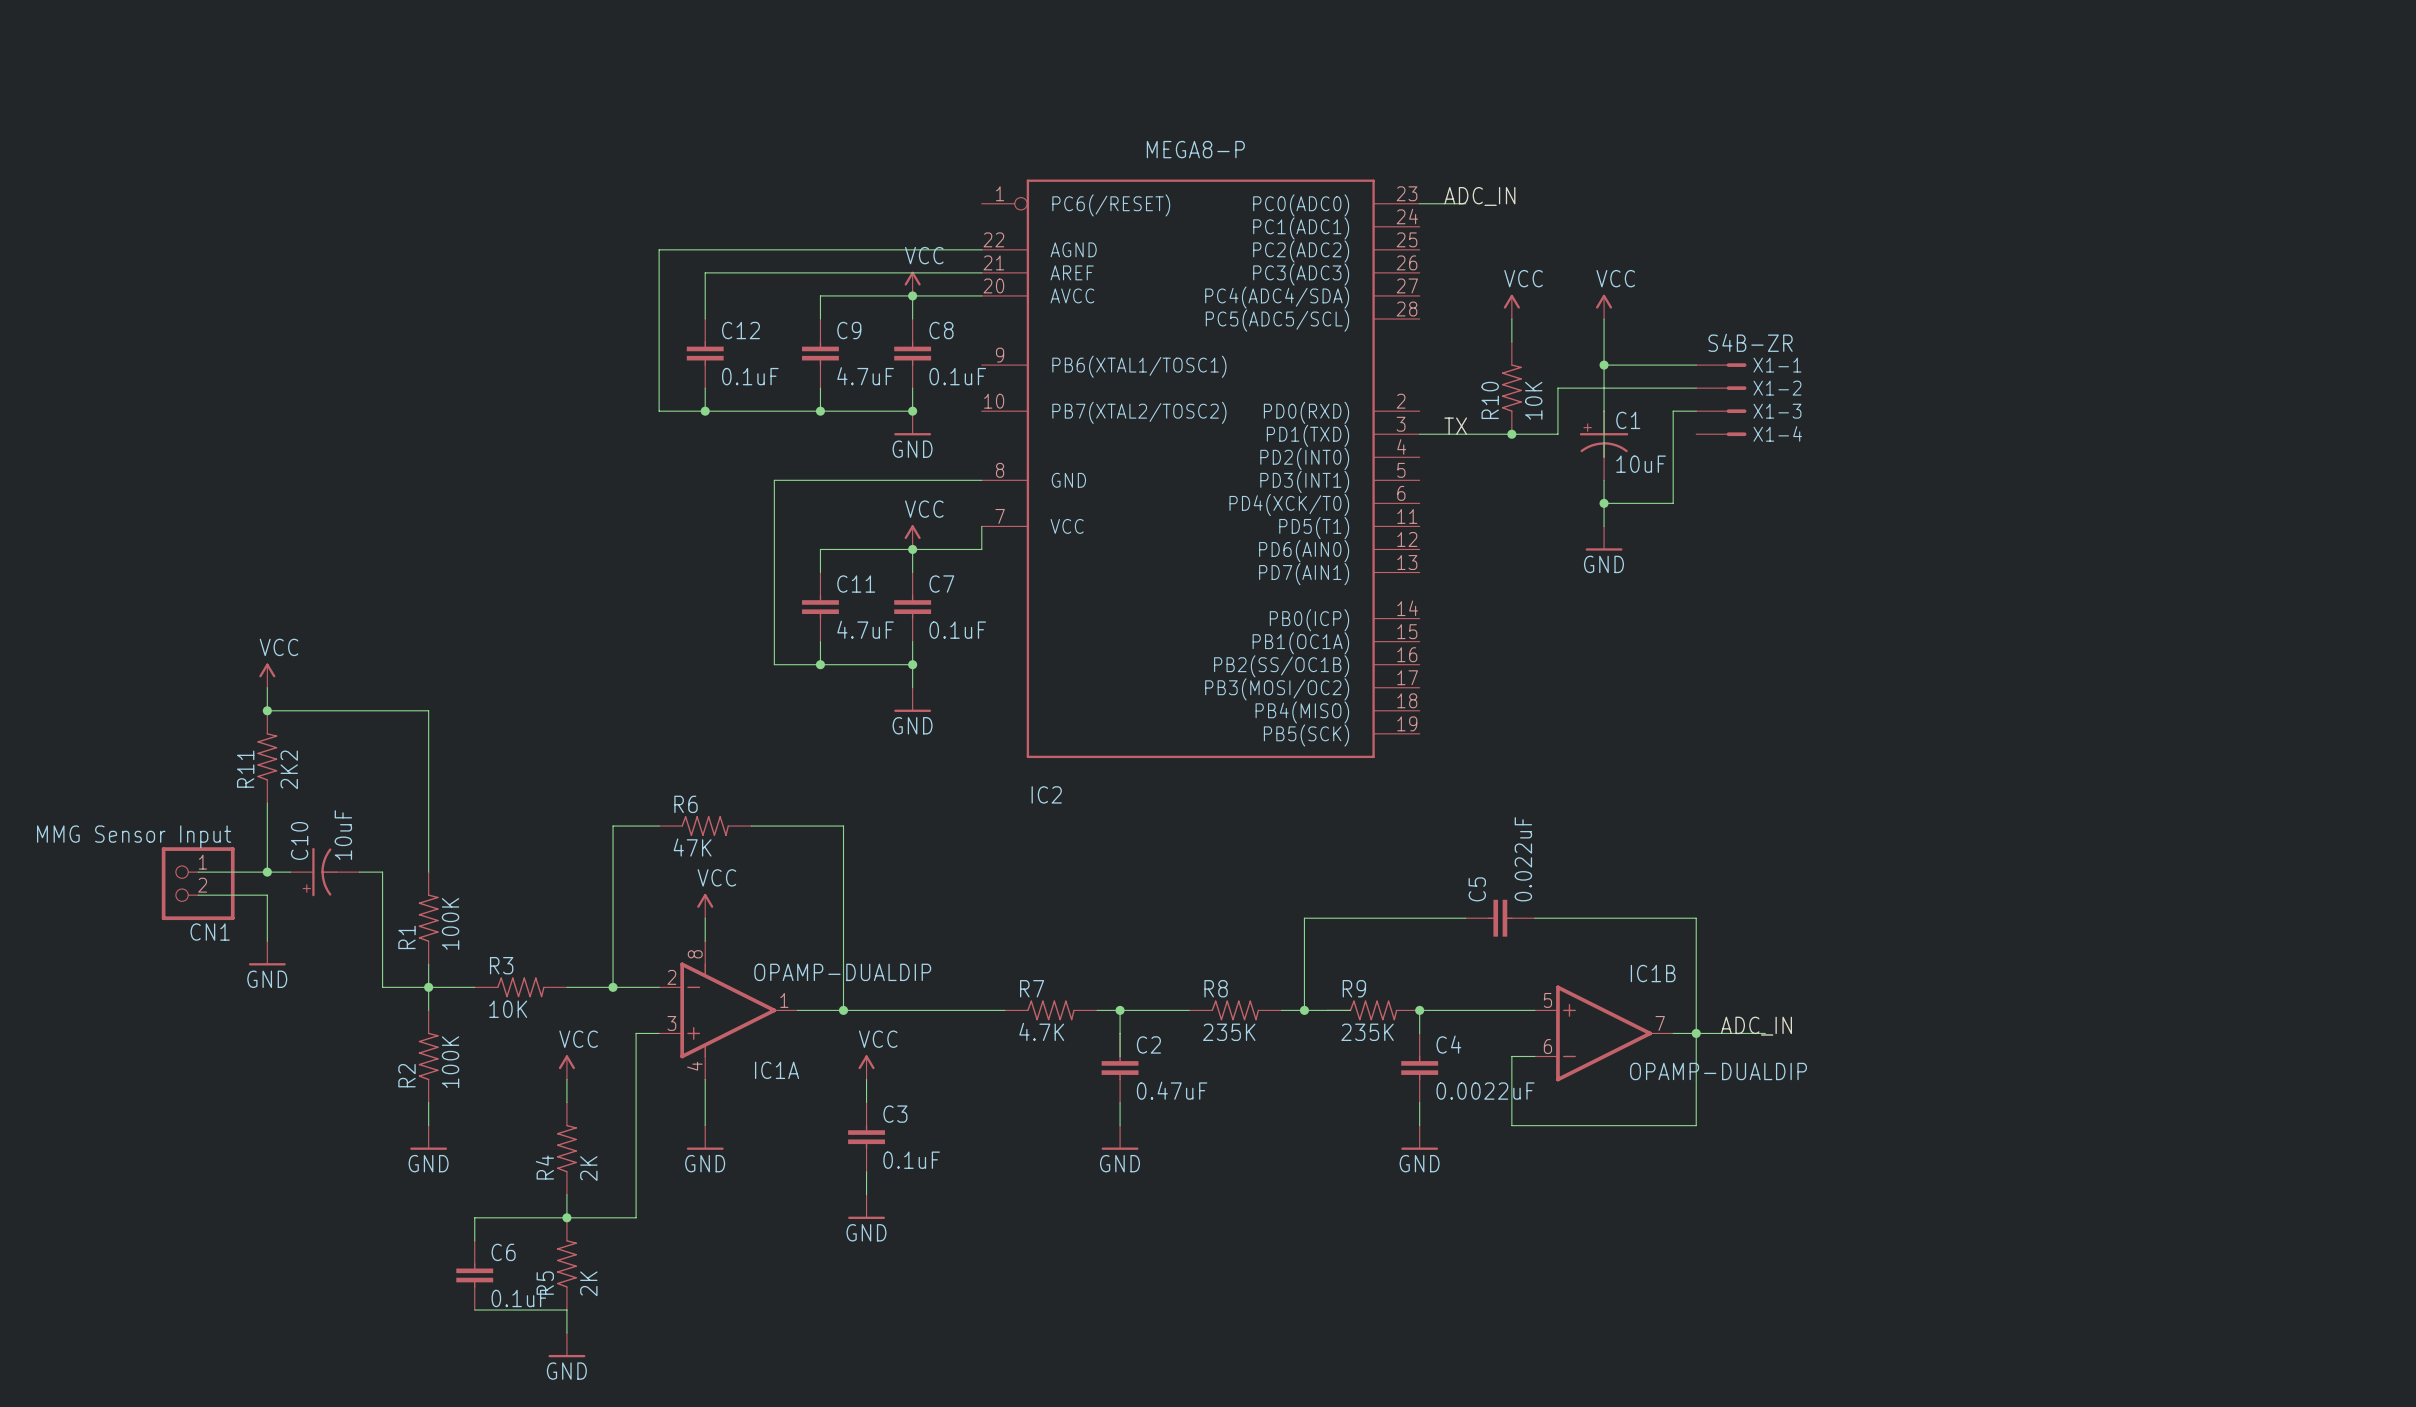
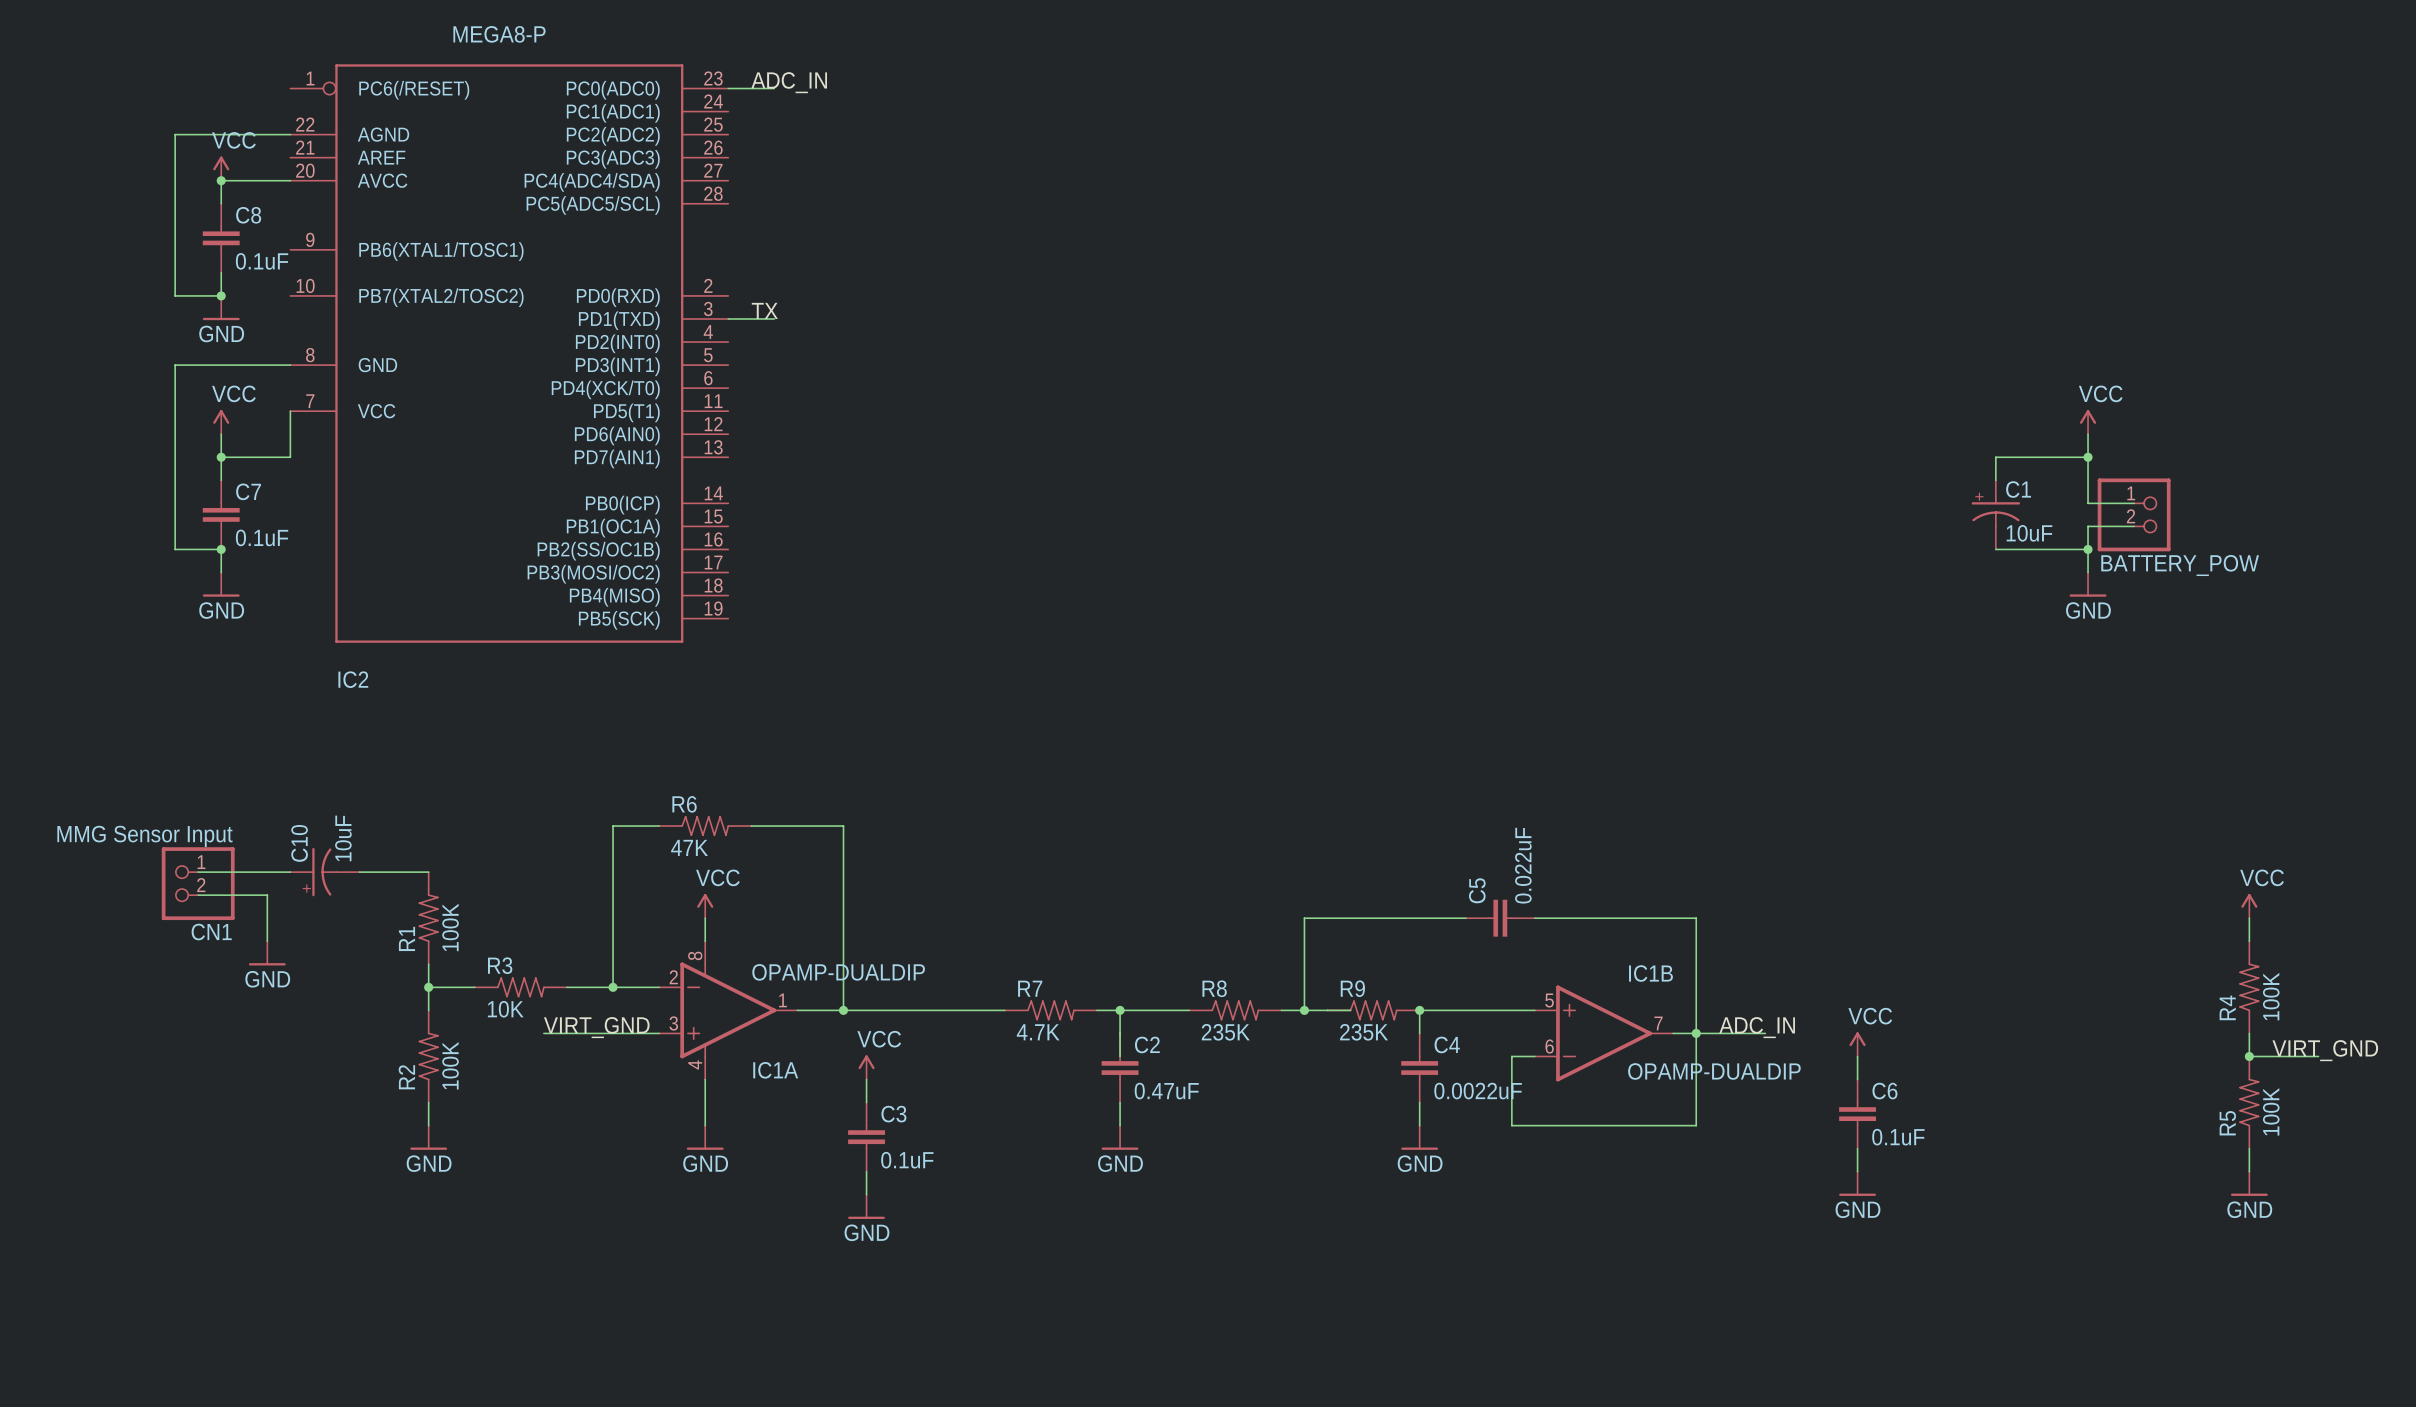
label: none -> ADC_IN (789, 82)
wire: none -> (728, 88) (774, 88)
wire: none -> (290, 134) (175, 134) (175, 295) (221, 295) (221, 272)
power symbol: none -> VCC (221, 168)
junction: none -> (221, 180)
wire: none -> (290, 180) (221, 180) (221, 203)
label: ADC_IN (1479, 196) -> none
wire: (1419, 203) (1465, 203) -> none
wire: (981, 249) (659, 249) (659, 411) (912, 411) (912, 388) -> none
wire: (981, 272) (705, 272) (705, 318) -> none
power symbol: VCC (912, 283) -> none
junction: none -> (221, 295)
wire: (912, 295) (912, 318) -> none
junction: (912, 295) -> none
wire: (981, 295) (820, 295) (820, 318) -> none
power symbol: VCC (1511, 306) -> none
power symbol: VCC (1604, 306) -> none
power symbol: none -> GND (221, 308)
label: none -> TX (764, 310)
wire: none -> (728, 318) (774, 318)
wire: (1511, 318) (1511, 342) -> none
wire: (1604, 318) (1604, 457) -> none
C12: 0.1uF (705, 353) -> none
C9: 4.7uF (820, 353) -> none
C8 position: (912, 353) -> (221, 238)
wire: none -> (290, 365) (175, 365) (175, 549) (221, 549) (221, 572)
wire: (1604, 365) (1696, 365) -> none
junction: (1604, 365) -> none
X1-1: S4B-ZR (1721, 365) -> none
wire: (705, 388) (705, 411) -> none
wire: (820, 388) (820, 411) -> none
R10: 10K (1511, 388) -> none
wire: (1696, 388) (1557, 388) (1557, 434) (1419, 434) -> none
X1-2: (1721, 388) -> none
wire: none -> (290, 411) (290, 457) (221, 457)
junction: (705, 411) -> none
junction: (820, 411) -> none
junction: (912, 411) -> none
wire: (1696, 411) (1673, 411) (1673, 503) (1604, 503) -> none
X1-3: (1721, 411) -> none
power symbol: none -> VCC (221, 422)
power symbol: none -> VCC (2088, 422)
power symbol: GND (912, 423) -> none
label: TX (1455, 426) -> none
wire: none -> (221, 434) (221, 480)
junction: (1511, 434) -> none
X1-4: (1721, 434) -> none
wire: none -> (2088, 434) (2088, 503) (2134, 503)
C1 position: (1604, 445) -> (1995, 514)
junction: none -> (221, 457)
wire: none -> (2088, 457) (1995, 457) (1995, 480)
junction: none -> (2088, 457)
IC2 position: (1200, 468) -> (509, 353)
wire: (981, 480) (774, 480) (774, 664) (912, 664) -> none
wire: (1604, 480) (1604, 526) -> none
junction: (1604, 503) -> none
BATTERY_POW: none -> (2134, 514)
wire: (981, 526) (981, 549) (820, 549) (820, 572) -> none
wire: none -> (2134, 526) (2088, 526) (2088, 572)
power symbol: VCC (912, 537) -> none
power symbol: GND (1604, 538) -> none
junction: none -> (221, 549)
wire: (912, 549) (912, 572) -> none
junction: (912, 549) -> none
wire: none -> (1995, 549) (2088, 549)
junction: none -> (2088, 549)
power symbol: none -> GND (221, 584)
power symbol: none -> GND (2088, 584)
C11: 4.7uF (820, 607) -> none
C7 position: (912, 607) -> (221, 514)
wire: (820, 641) (820, 664) -> none
wire: (912, 641) (912, 687) -> none
junction: (820, 664) -> none
junction: (912, 664) -> none
power symbol: VCC (267, 675) -> none
wire: (267, 687) (267, 710) (428, 710) (428, 872) -> none
power symbol: GND (912, 699) -> none
junction: (267, 710) -> none
R11: 2K2 (267, 756) -> none
wire: (267, 802) (267, 872) -> none
junction: (267, 872) -> none
wire: (382, 872) (382, 987) (428, 987) -> (382, 872) (428, 872)
power symbol: none -> VCC (2249, 906)
wire: none -> (2249, 918) (2249, 941)
label: none -> VIRT_GND (596, 1027)
wire: (636, 1033) (636, 1217) (474, 1217) (474, 1240) -> (636, 1033) (543, 1033)
wire: none -> (2249, 1033) (2249, 1056) (2318, 1056)
power symbol: none -> VCC (1857, 1044)
label: none -> VIRT_GND (2325, 1050)
wire: none -> (1857, 1056) (1857, 1079)
junction: none -> (2249, 1056)
power symbol: VCC (566, 1067) -> none
wire: (566, 1079) (566, 1102) -> none
R4 position: (566, 1148) -> (2249, 987)
wire: none -> (1857, 1148) (1857, 1171)
wire: none -> (2249, 1148) (2249, 1171)
R4 value: 2K (588, 1168) -> 100K (2271, 996)
power symbol: none -> GND (1857, 1183)
power symbol: none -> GND (2249, 1183)
wire: (566, 1194) (566, 1217) -> none
junction: (566, 1217) -> none
R5 position: (566, 1263) -> (2249, 1102)
C6 position: (474, 1275) -> (1857, 1114)
R5 value: 2K (588, 1283) -> 100K (2271, 1111)
wire: (474, 1310) (566, 1310) (566, 1333) -> none
power symbol: GND (566, 1345) -> none

